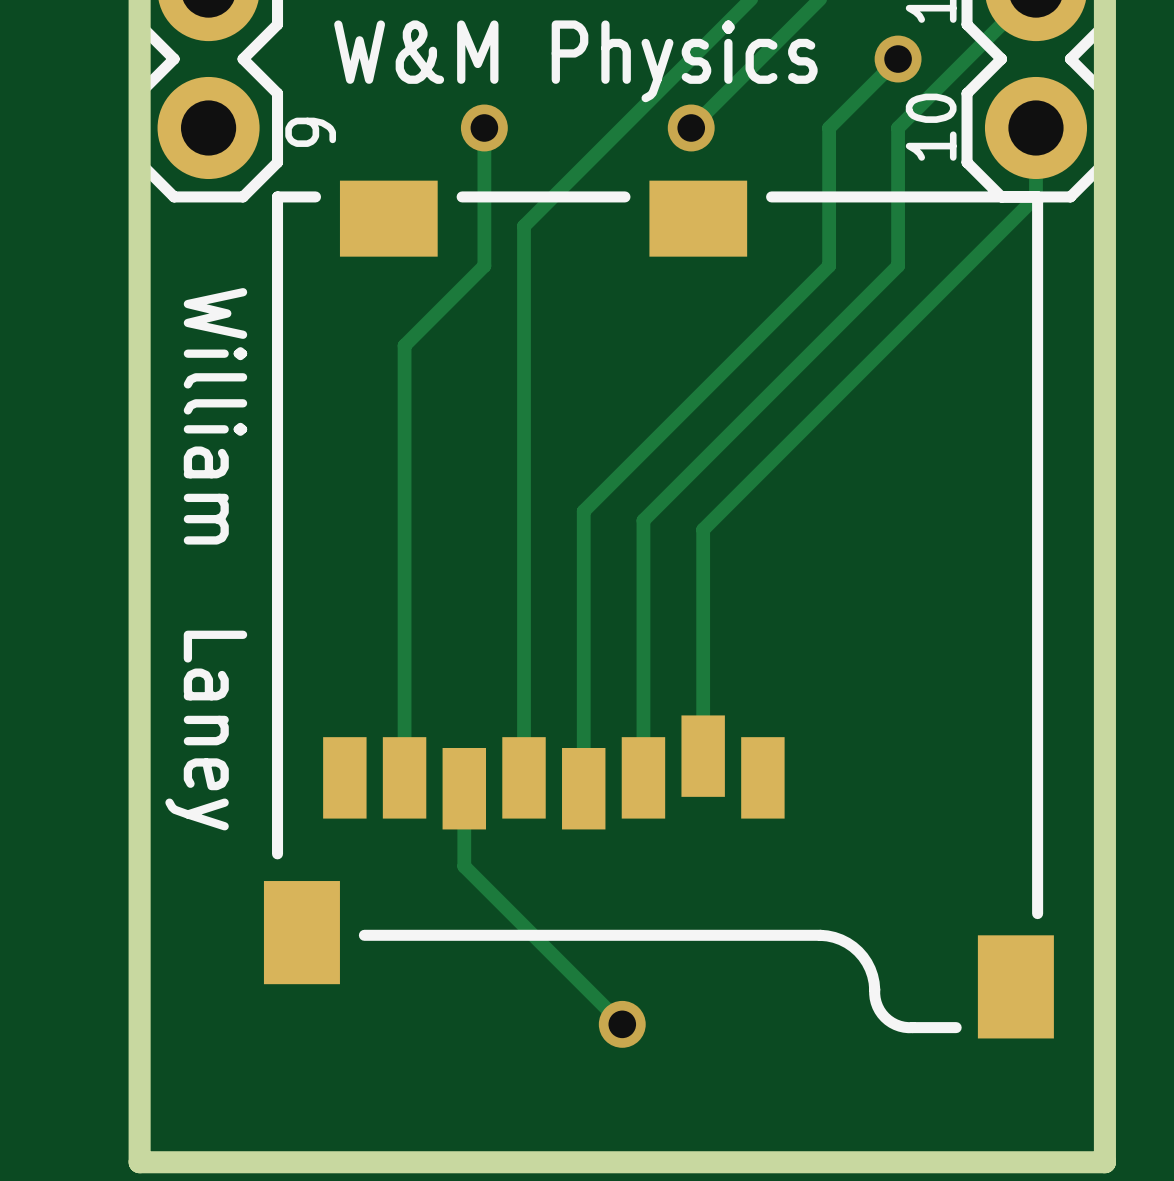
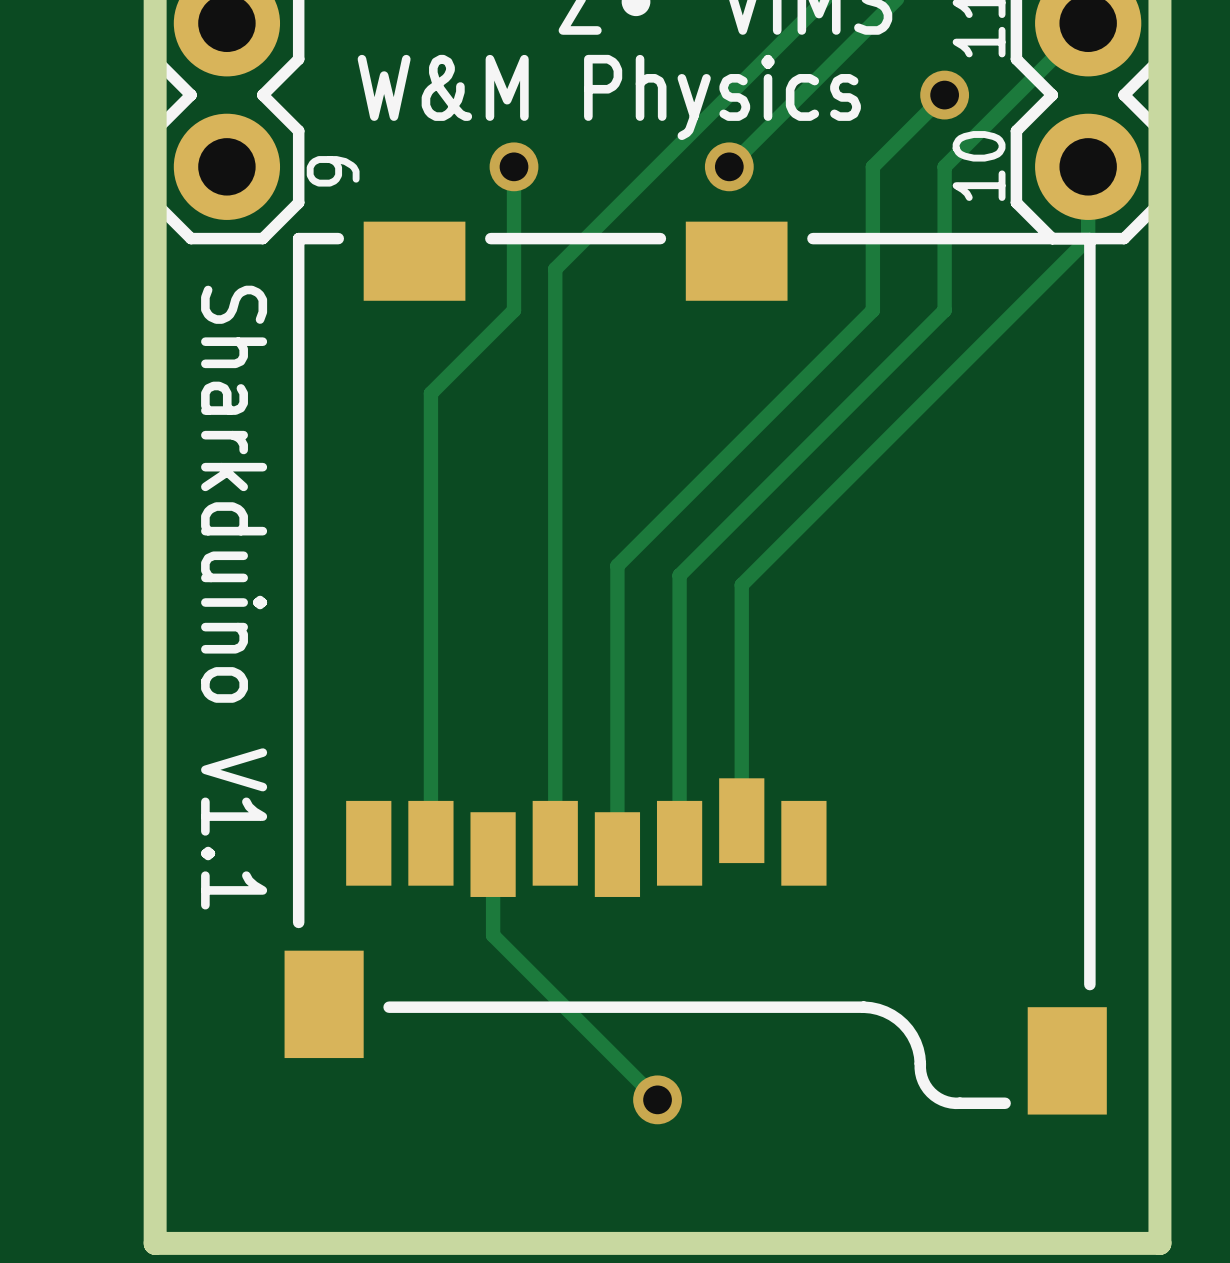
text: William (215, 416) -> Sharkduino V1.1 (234, 597)
text: Laney (206, 730) -> none

